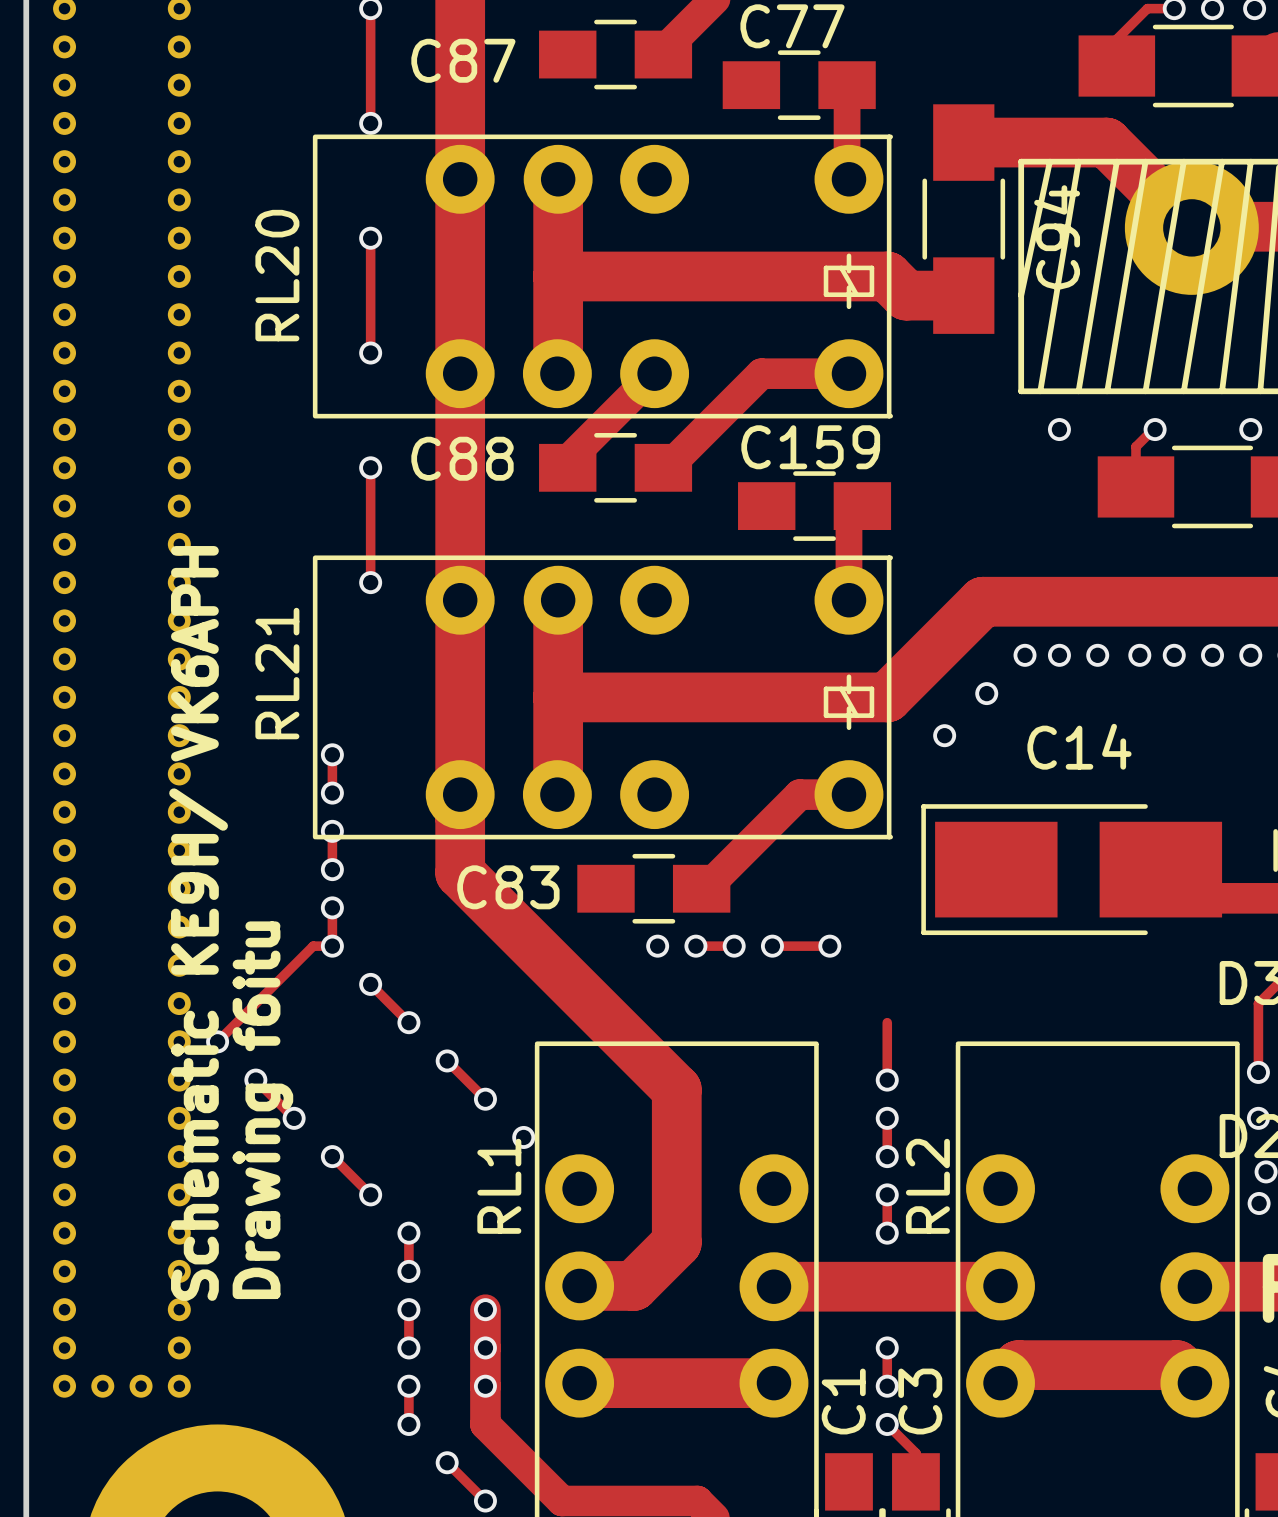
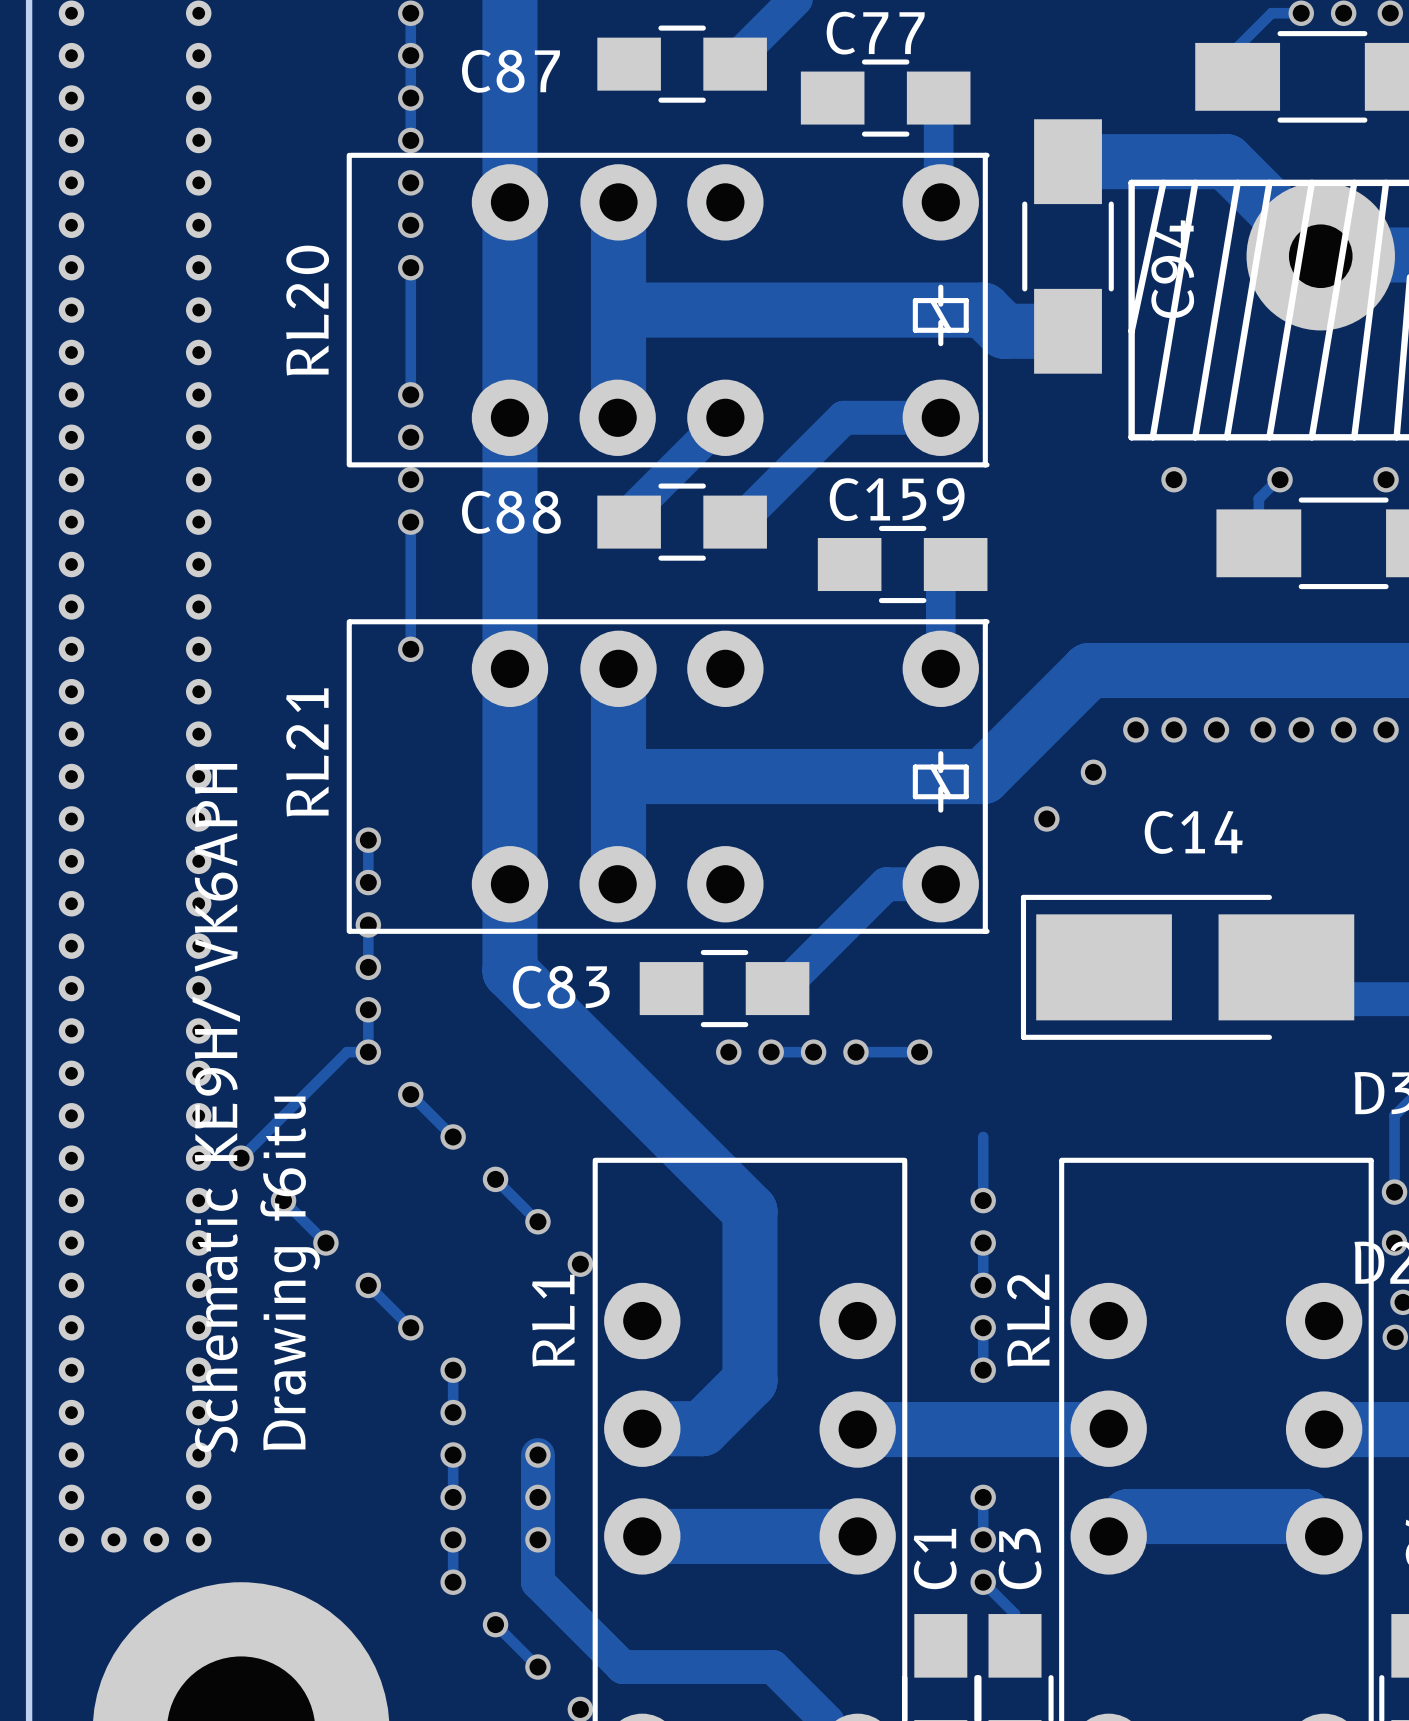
via: none -> (410, 55)
via: none -> (410, 98)
via: none -> (410, 182)
via: none -> (410, 225)
via: none -> (410, 437)
via: none -> (410, 479)

